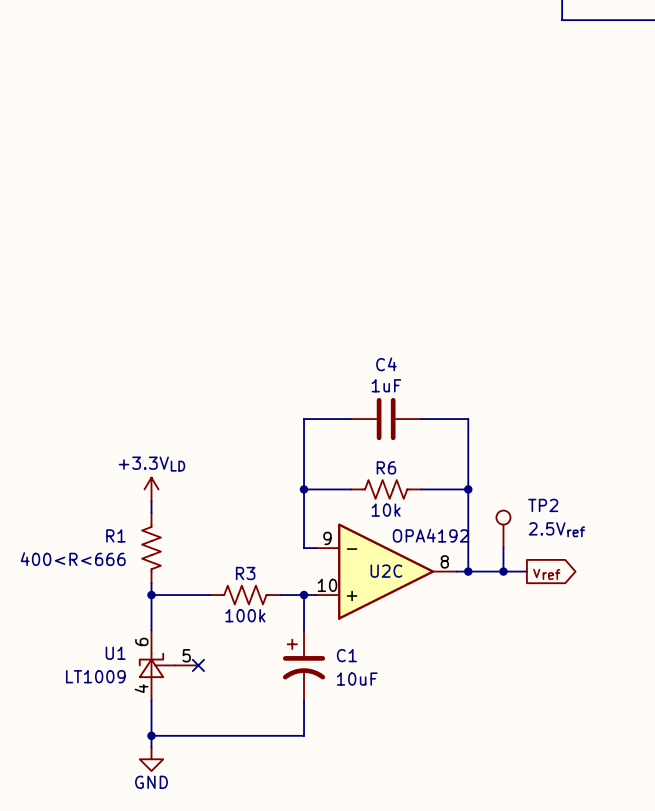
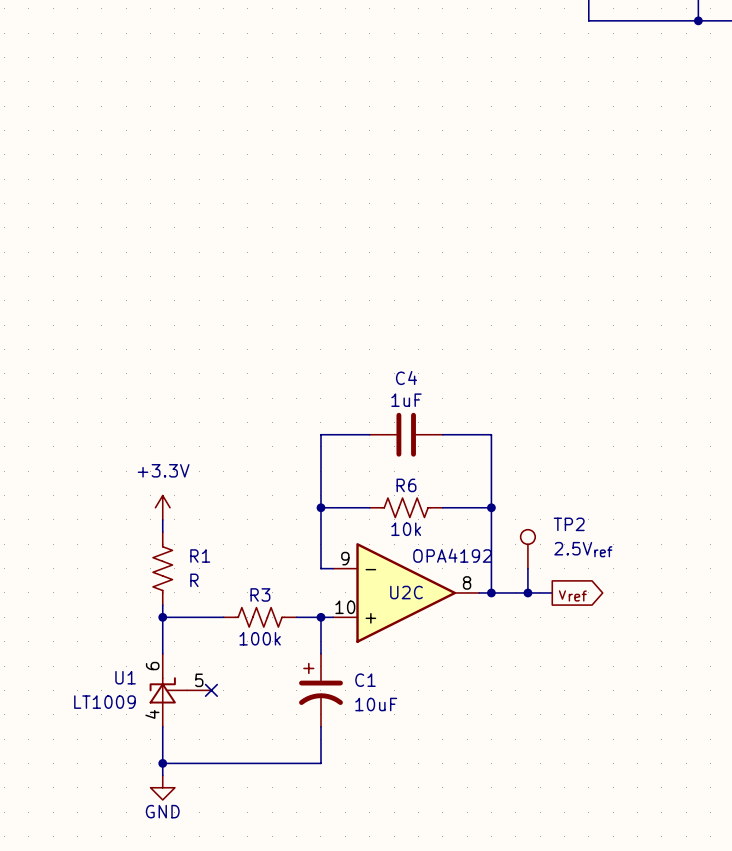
power symbol: +3.3VLD (151, 489) -> +3.3V (162, 507)
R1 flip: as is (151, 548) -> left-right (162, 568)
R1 value: 400<R<666 (73, 559) -> R (194, 580)

